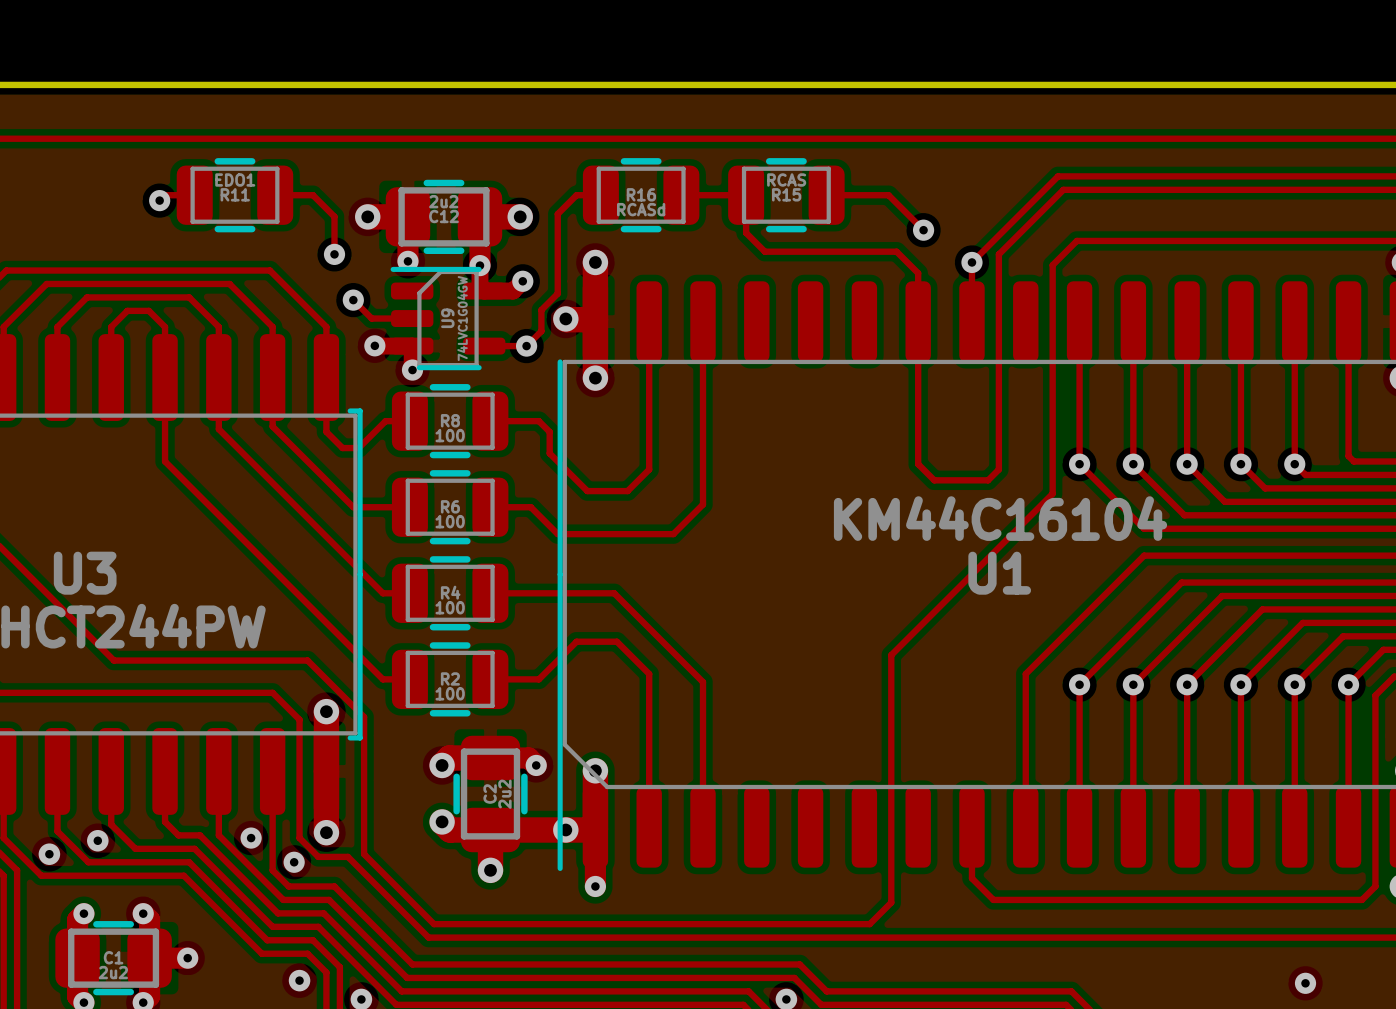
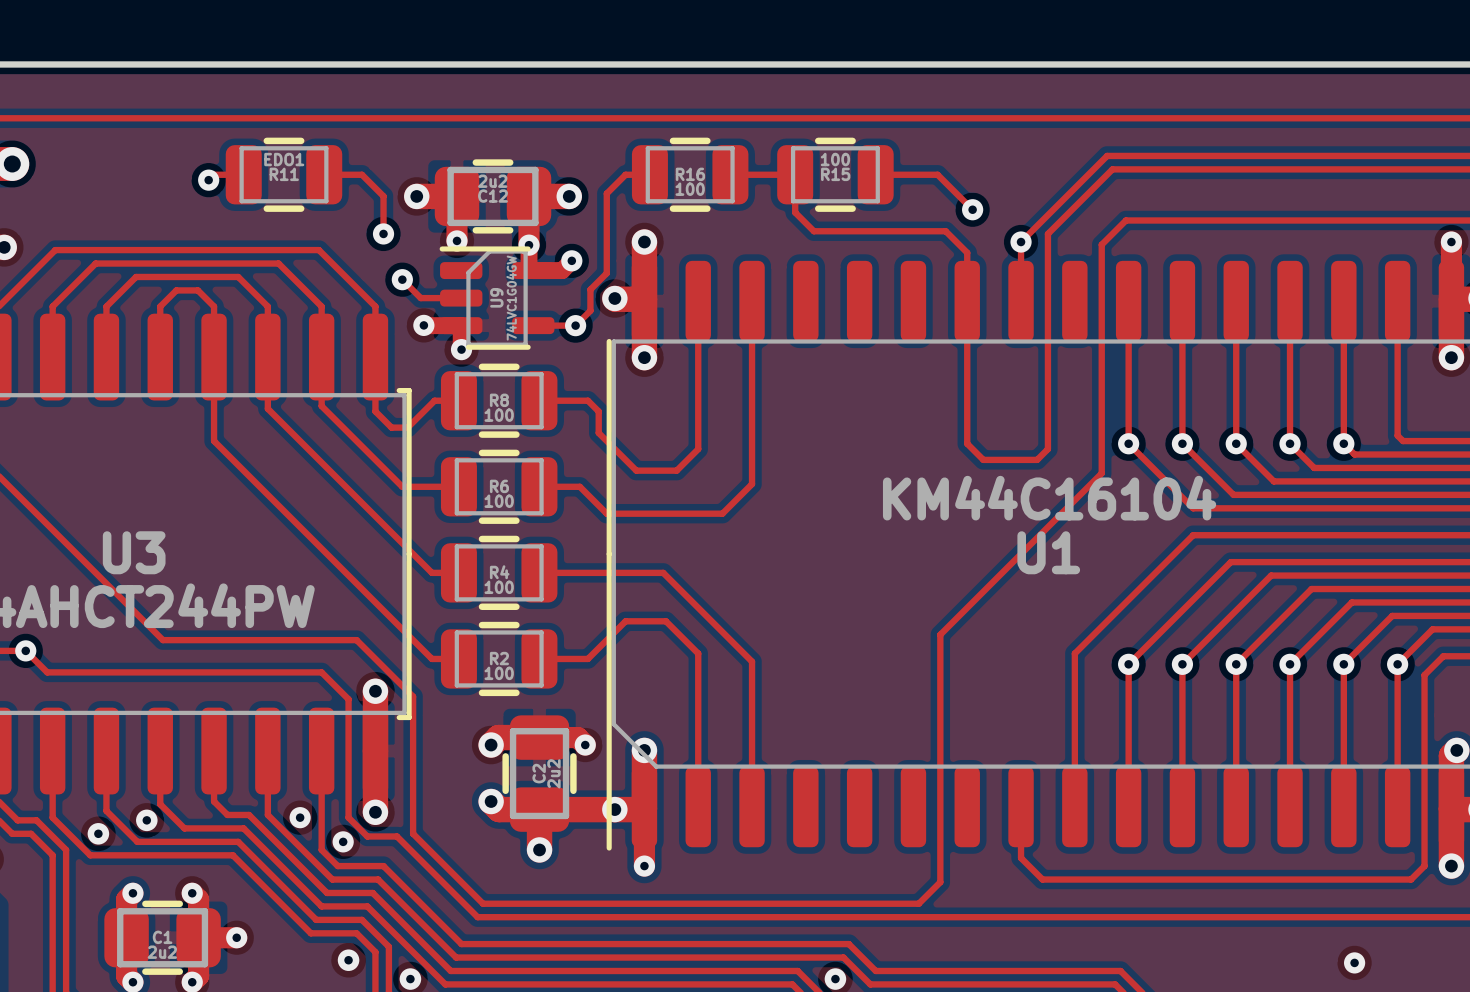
R15 value: RCAS (786, 179) -> 100 (835, 159)
R16 value: RCASd (641, 209) -> 100 (690, 189)

